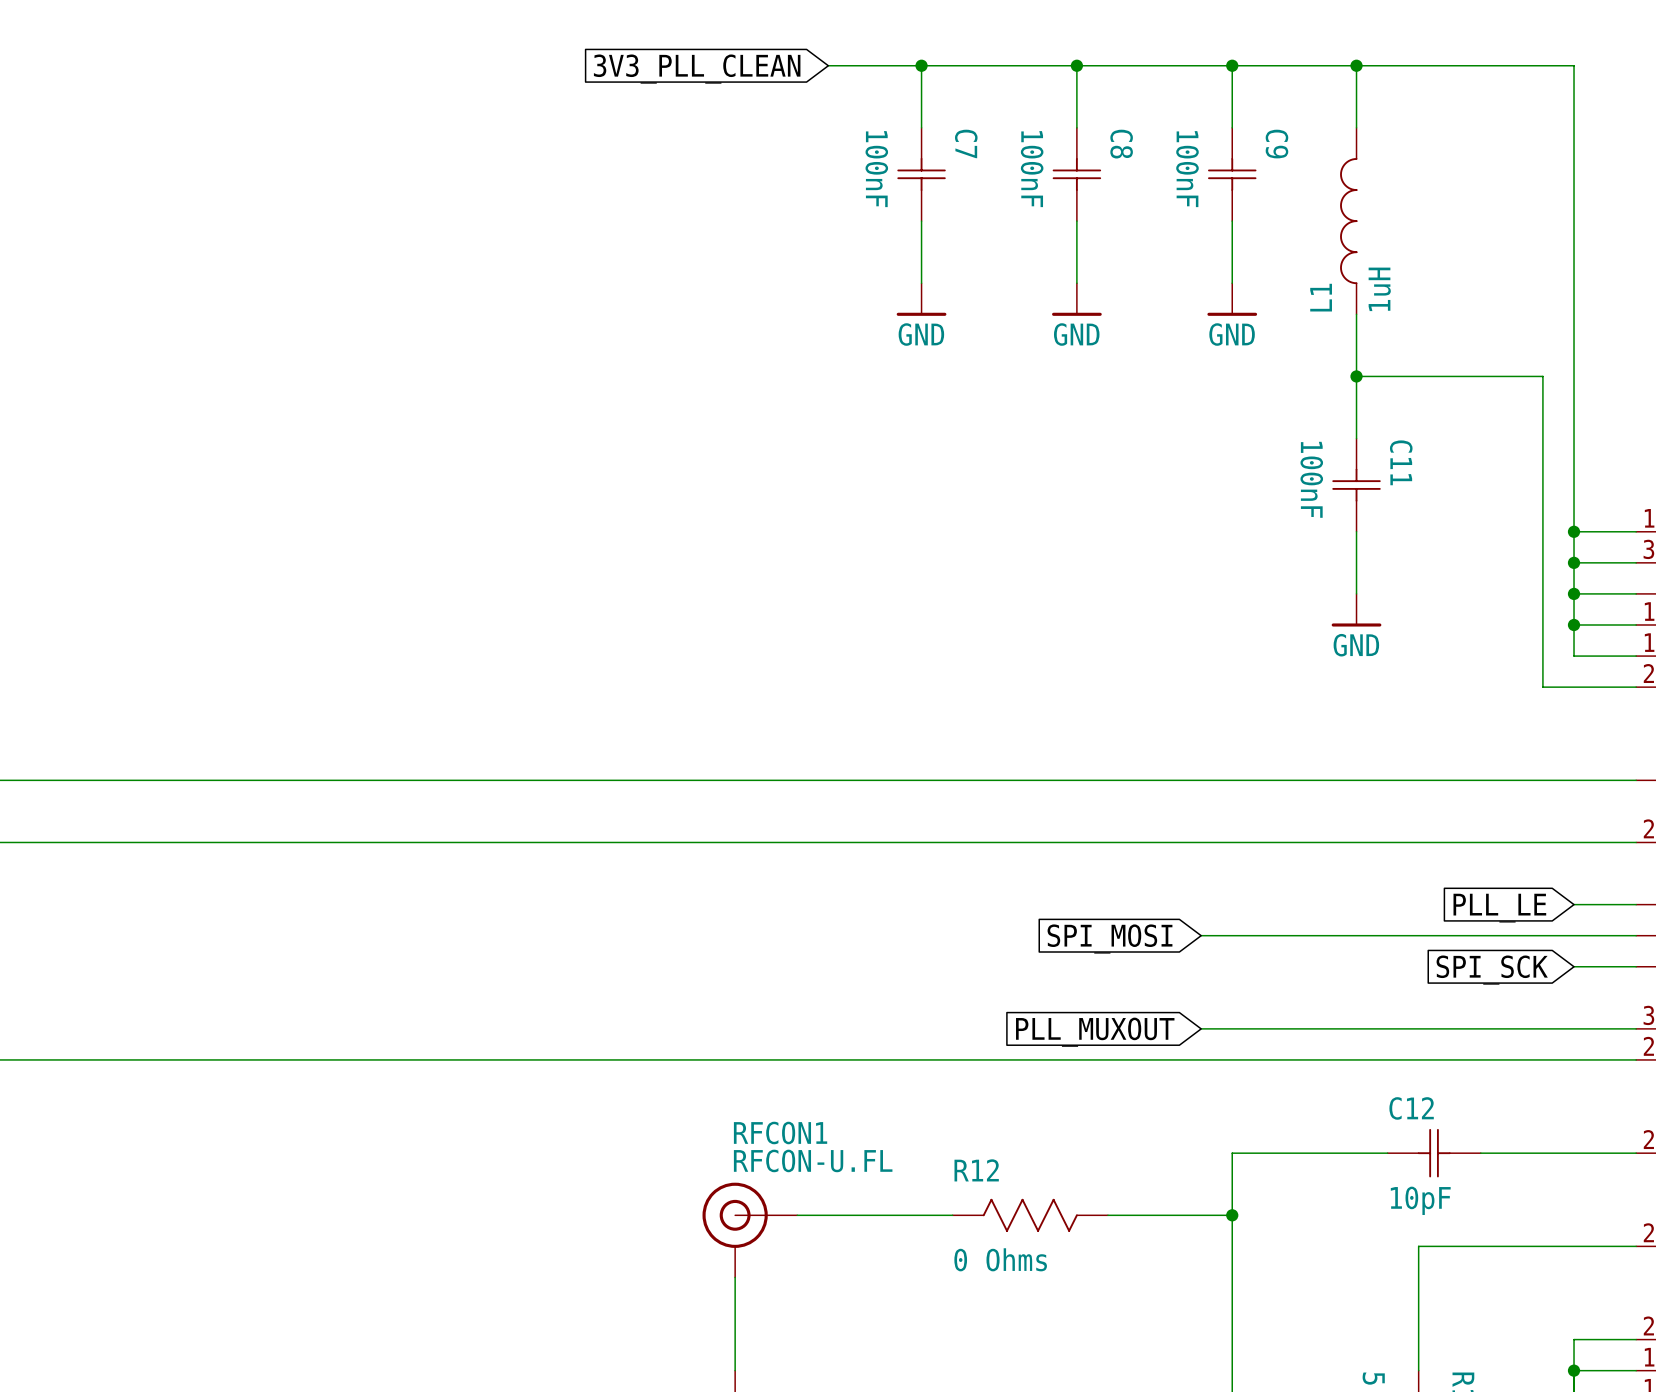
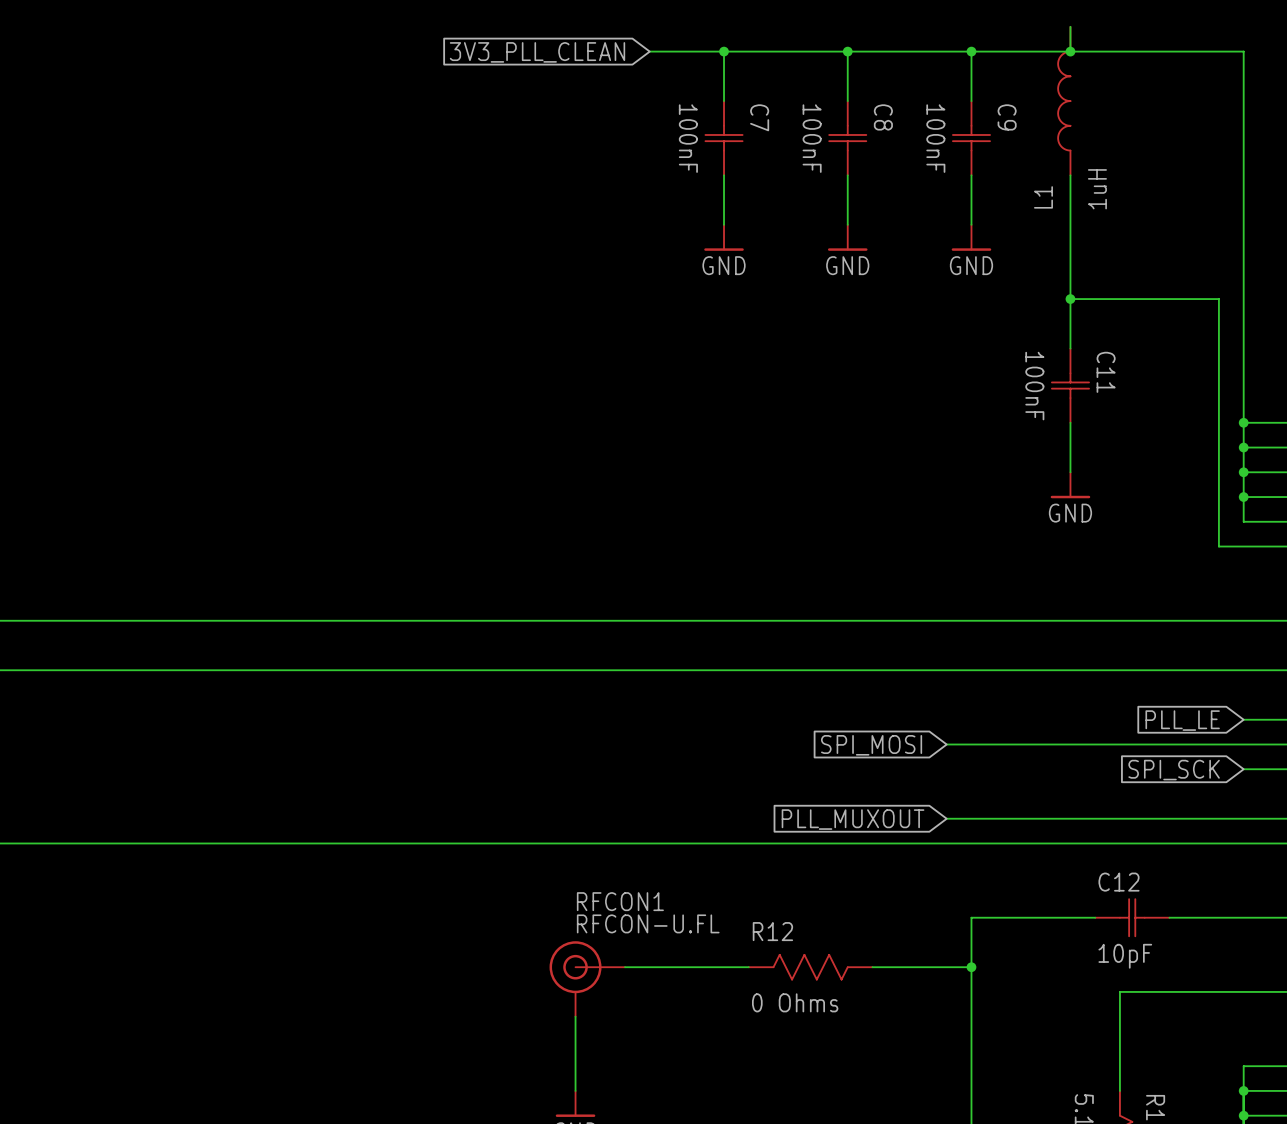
wire: (1356, 65) (1356, 127) -> (1070, 51) (1070, 26)
L1 position: (1348, 221) -> (1064, 101)
wire: none -> (1070, 175) (1070, 249)
L1 value position: 1uH (1379, 289) -> 1uH (1097, 189)
L1 name position: L1 (1321, 297) -> L1 (1043, 197)

